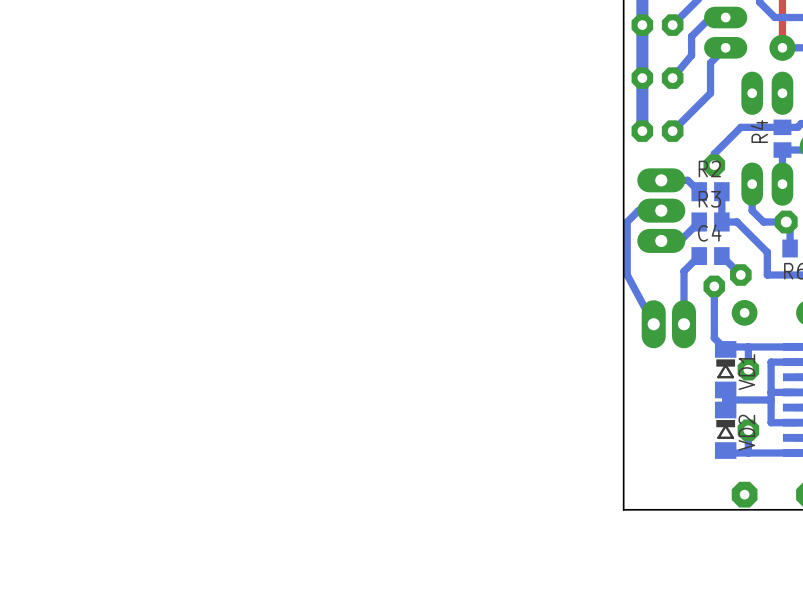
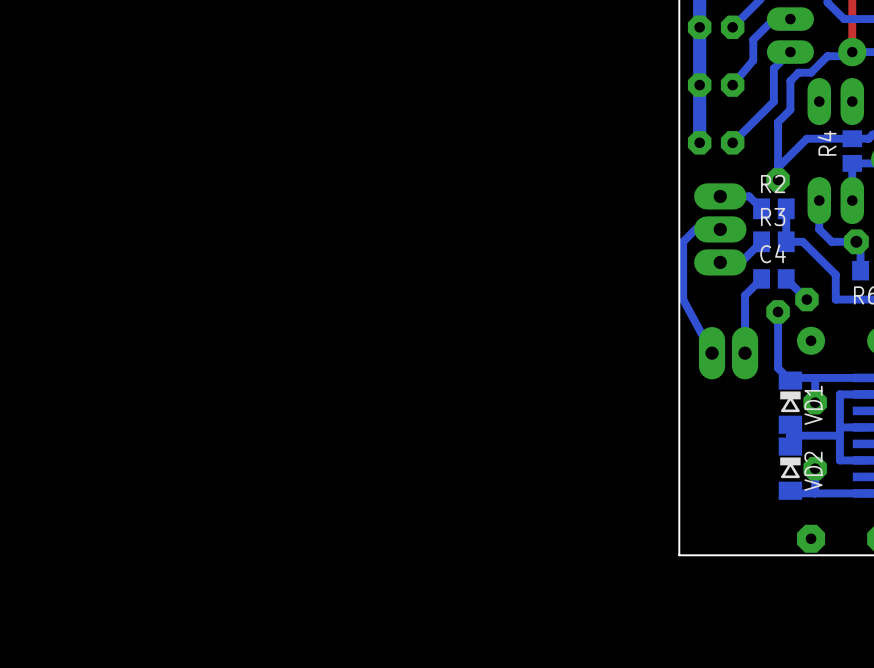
bottom track: none -> (852, 52) (848, 56) (827, 56) (811, 72) (798, 72) (790, 80) (790, 109) (778, 122) (778, 167)

